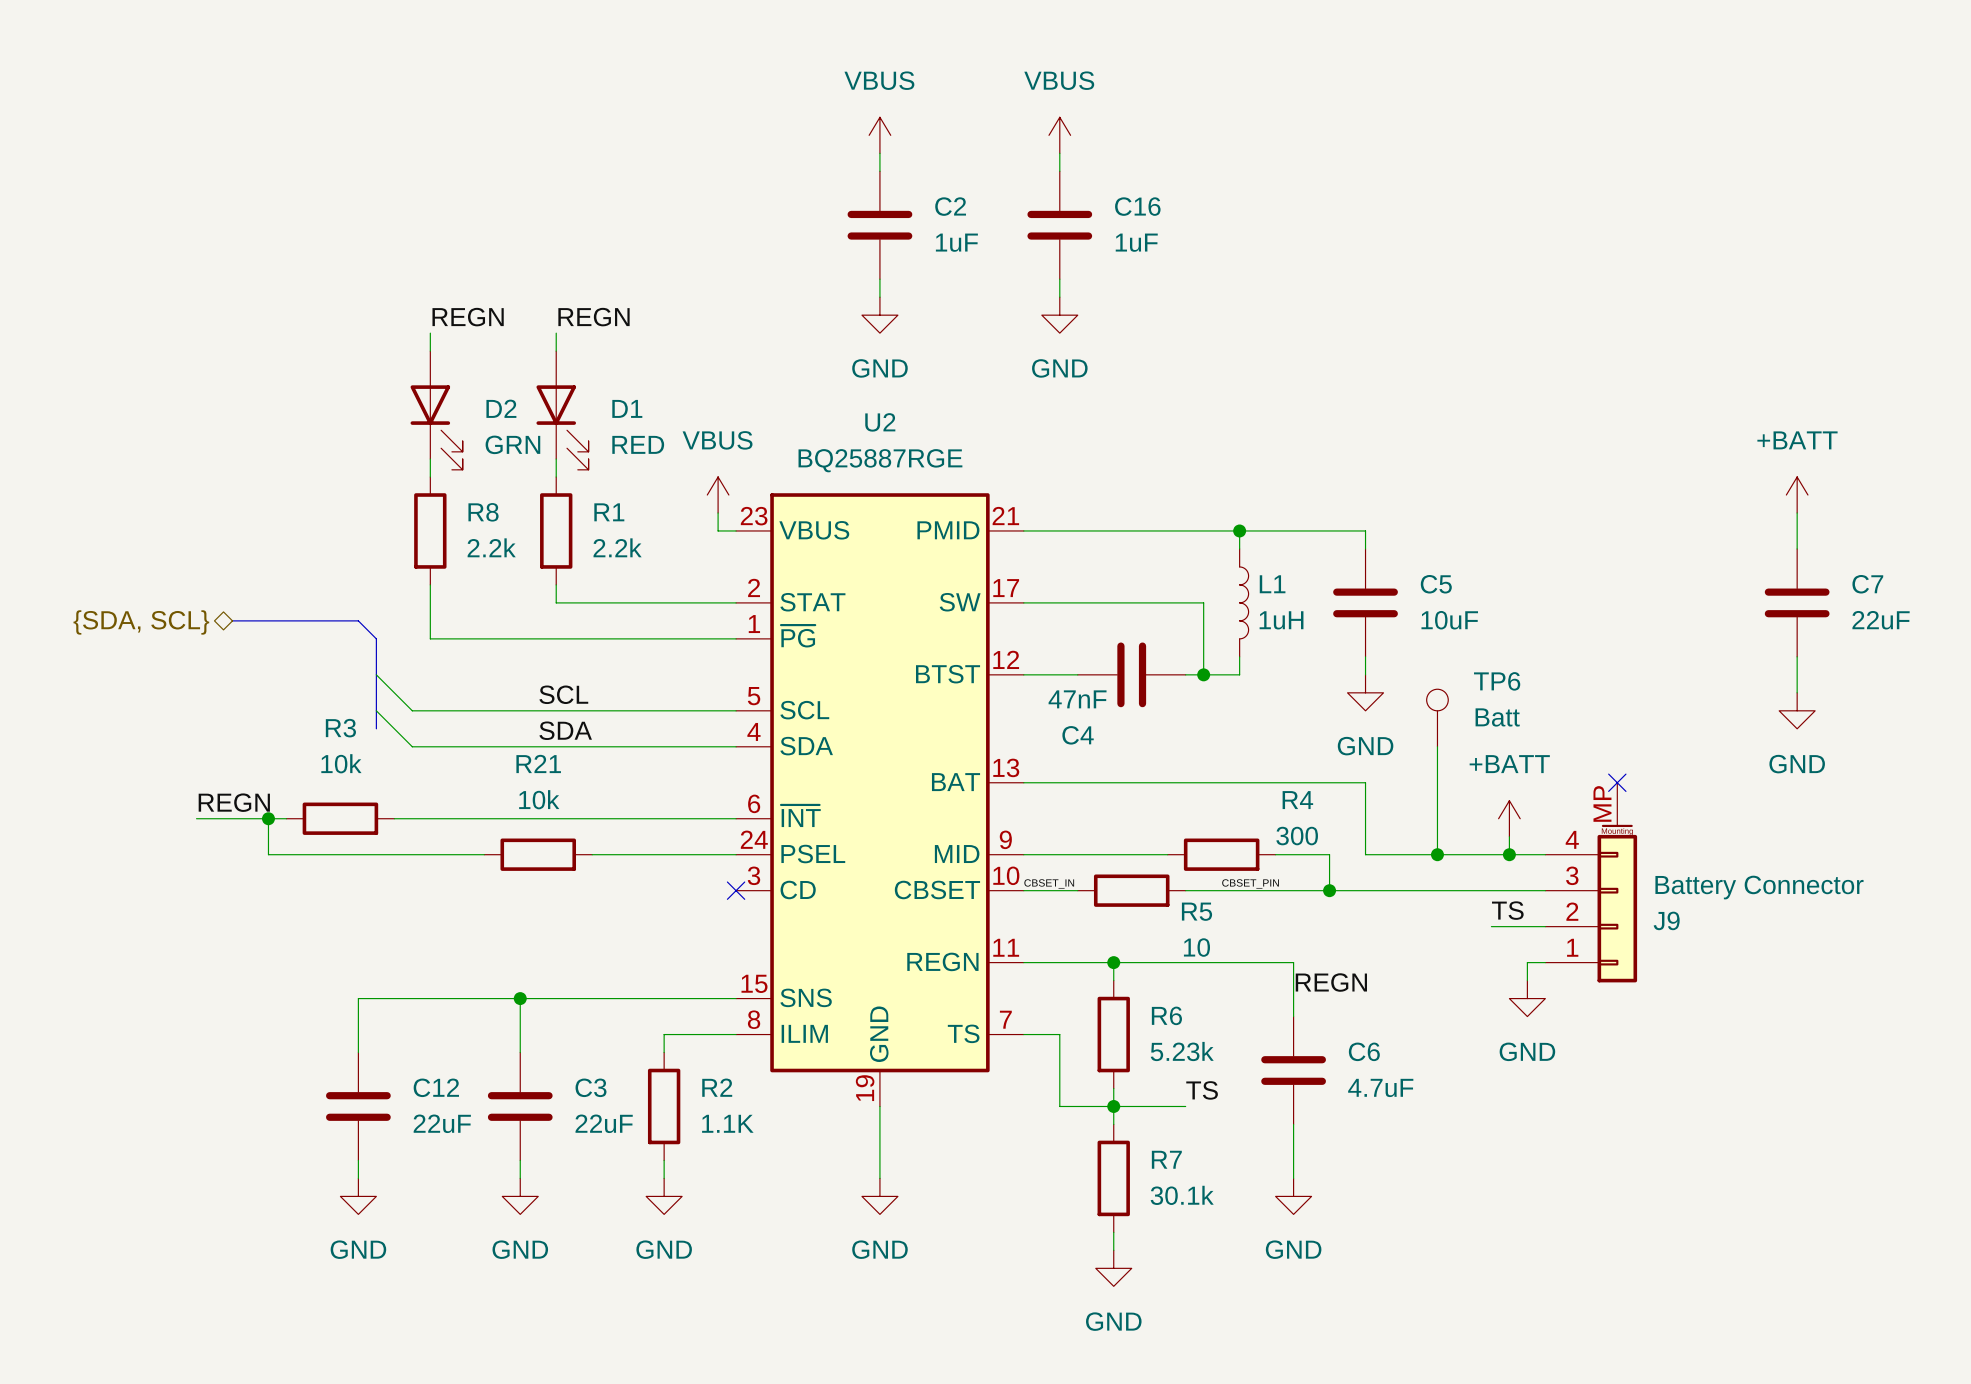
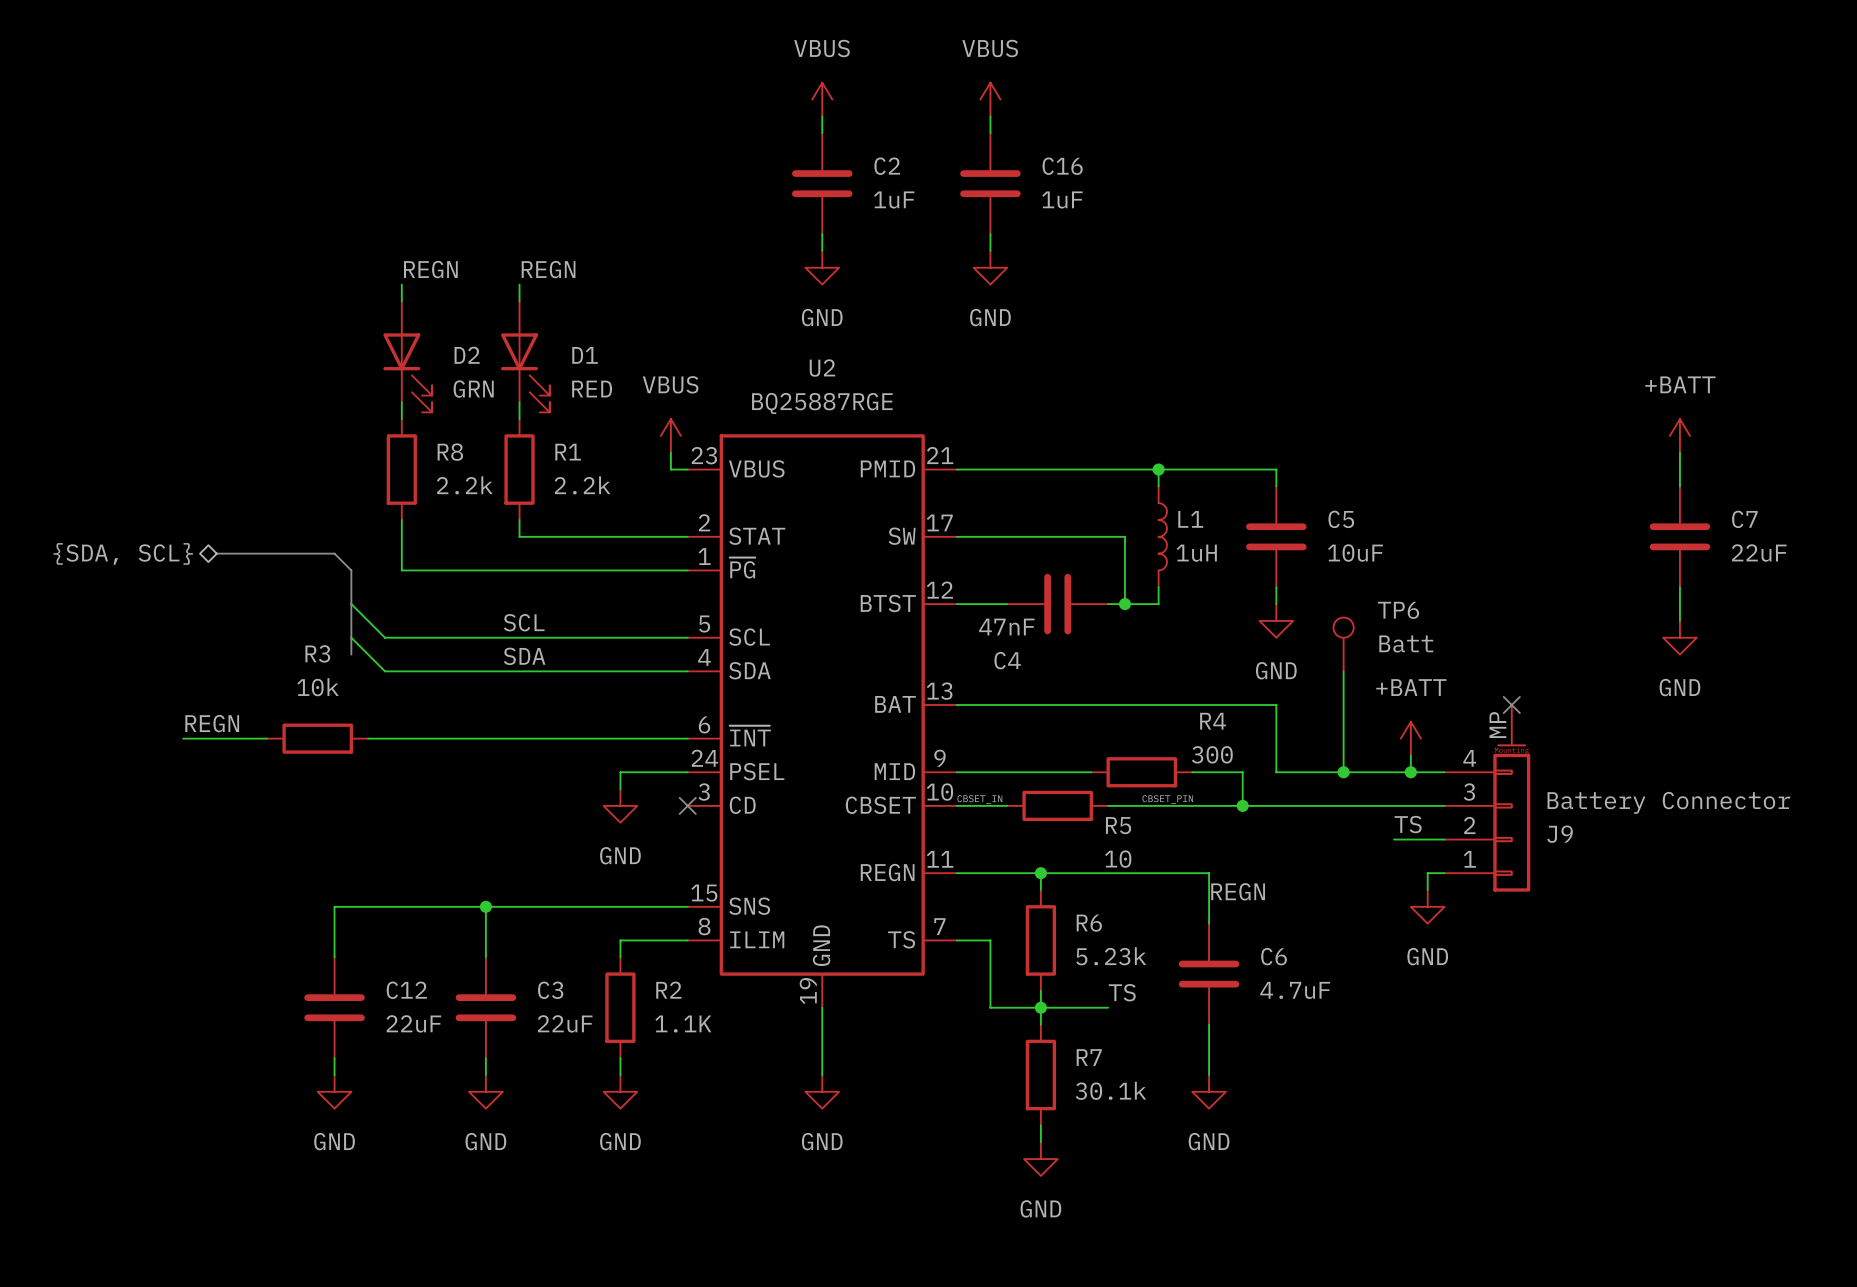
wire: (268, 818) (268, 854) (484, 854) -> none
junction: (268, 818) -> none
R21: 10k (538, 854) -> none
wire: (592, 854) (664, 854) -> (620, 789) (620, 772)
power symbol: none -> GND (620, 805)

